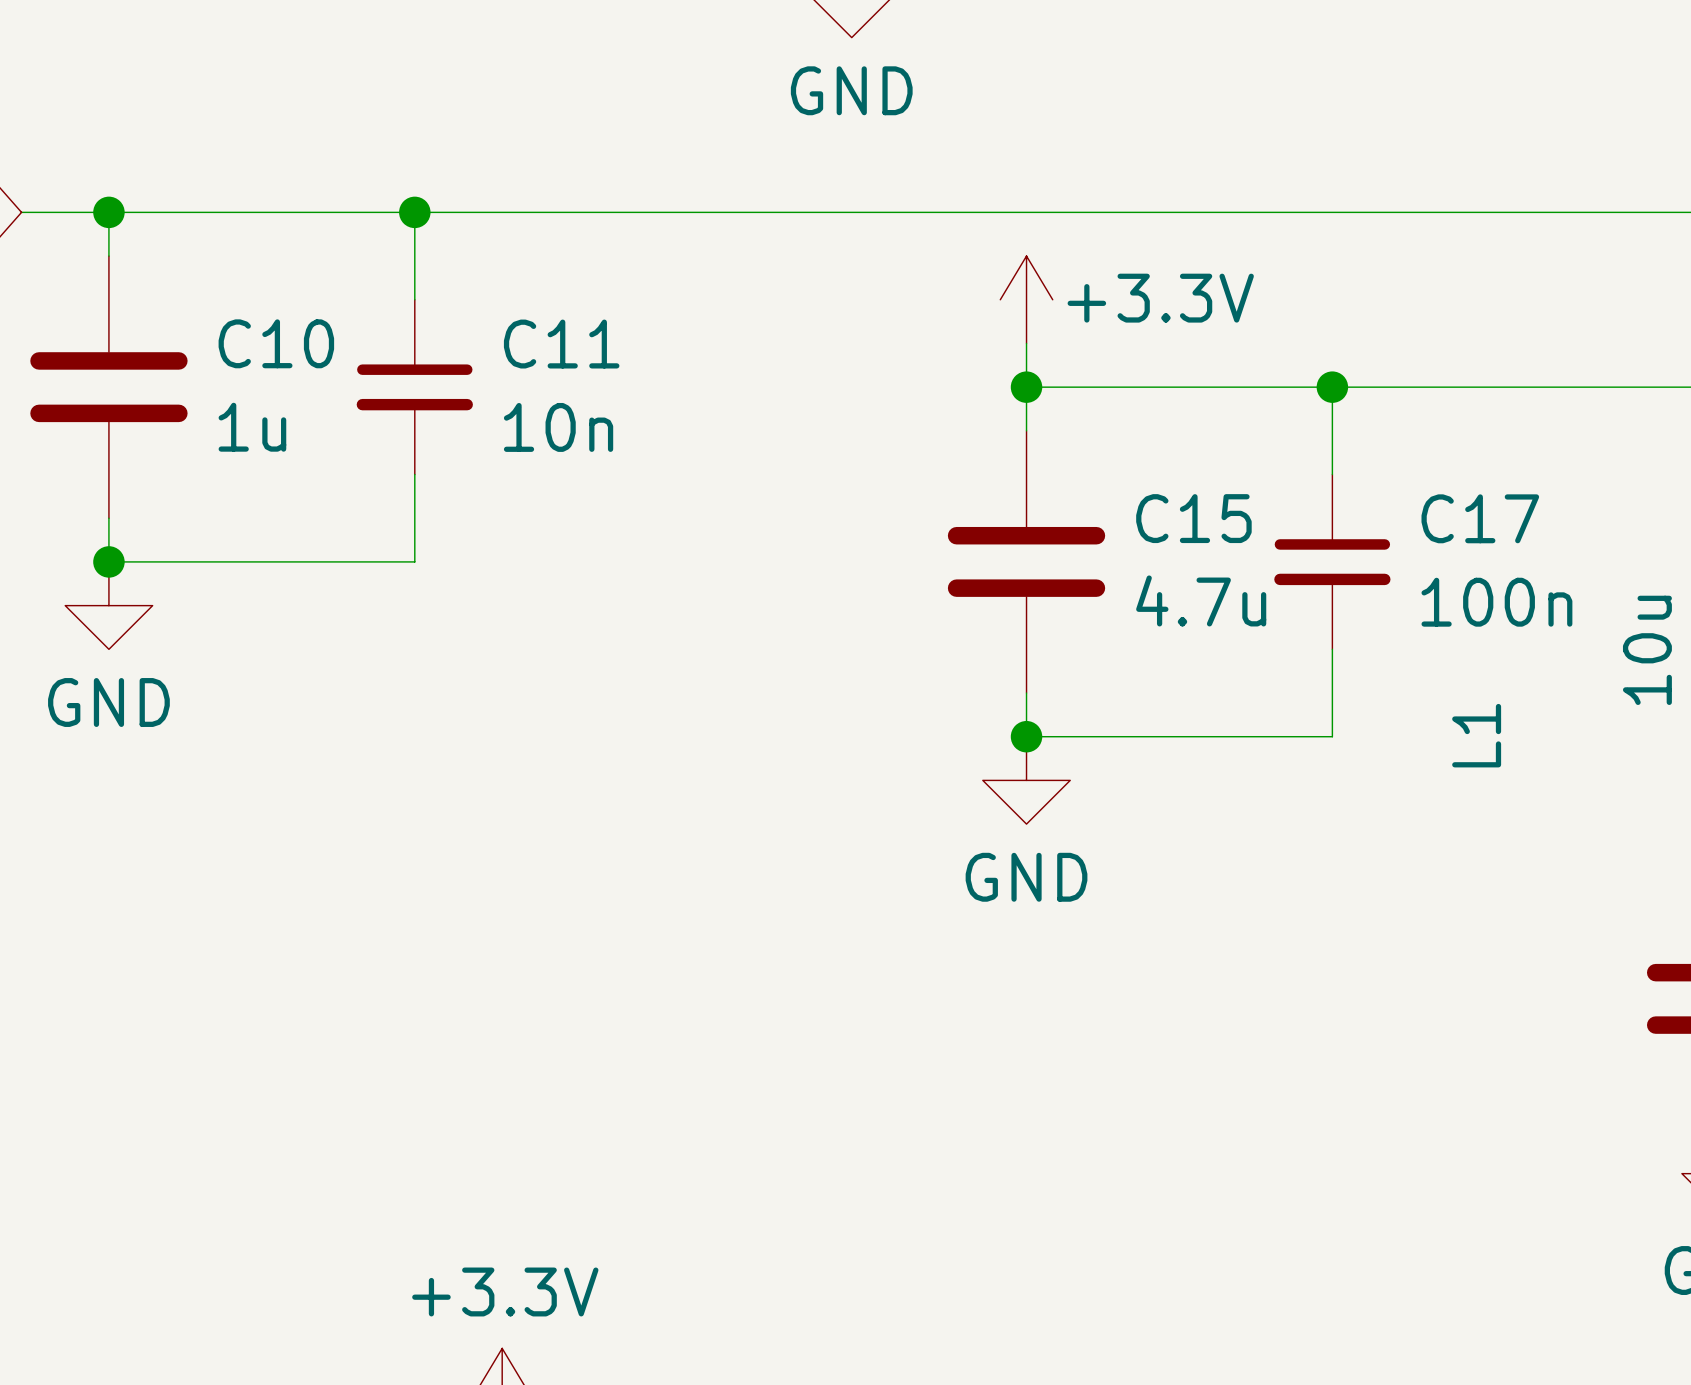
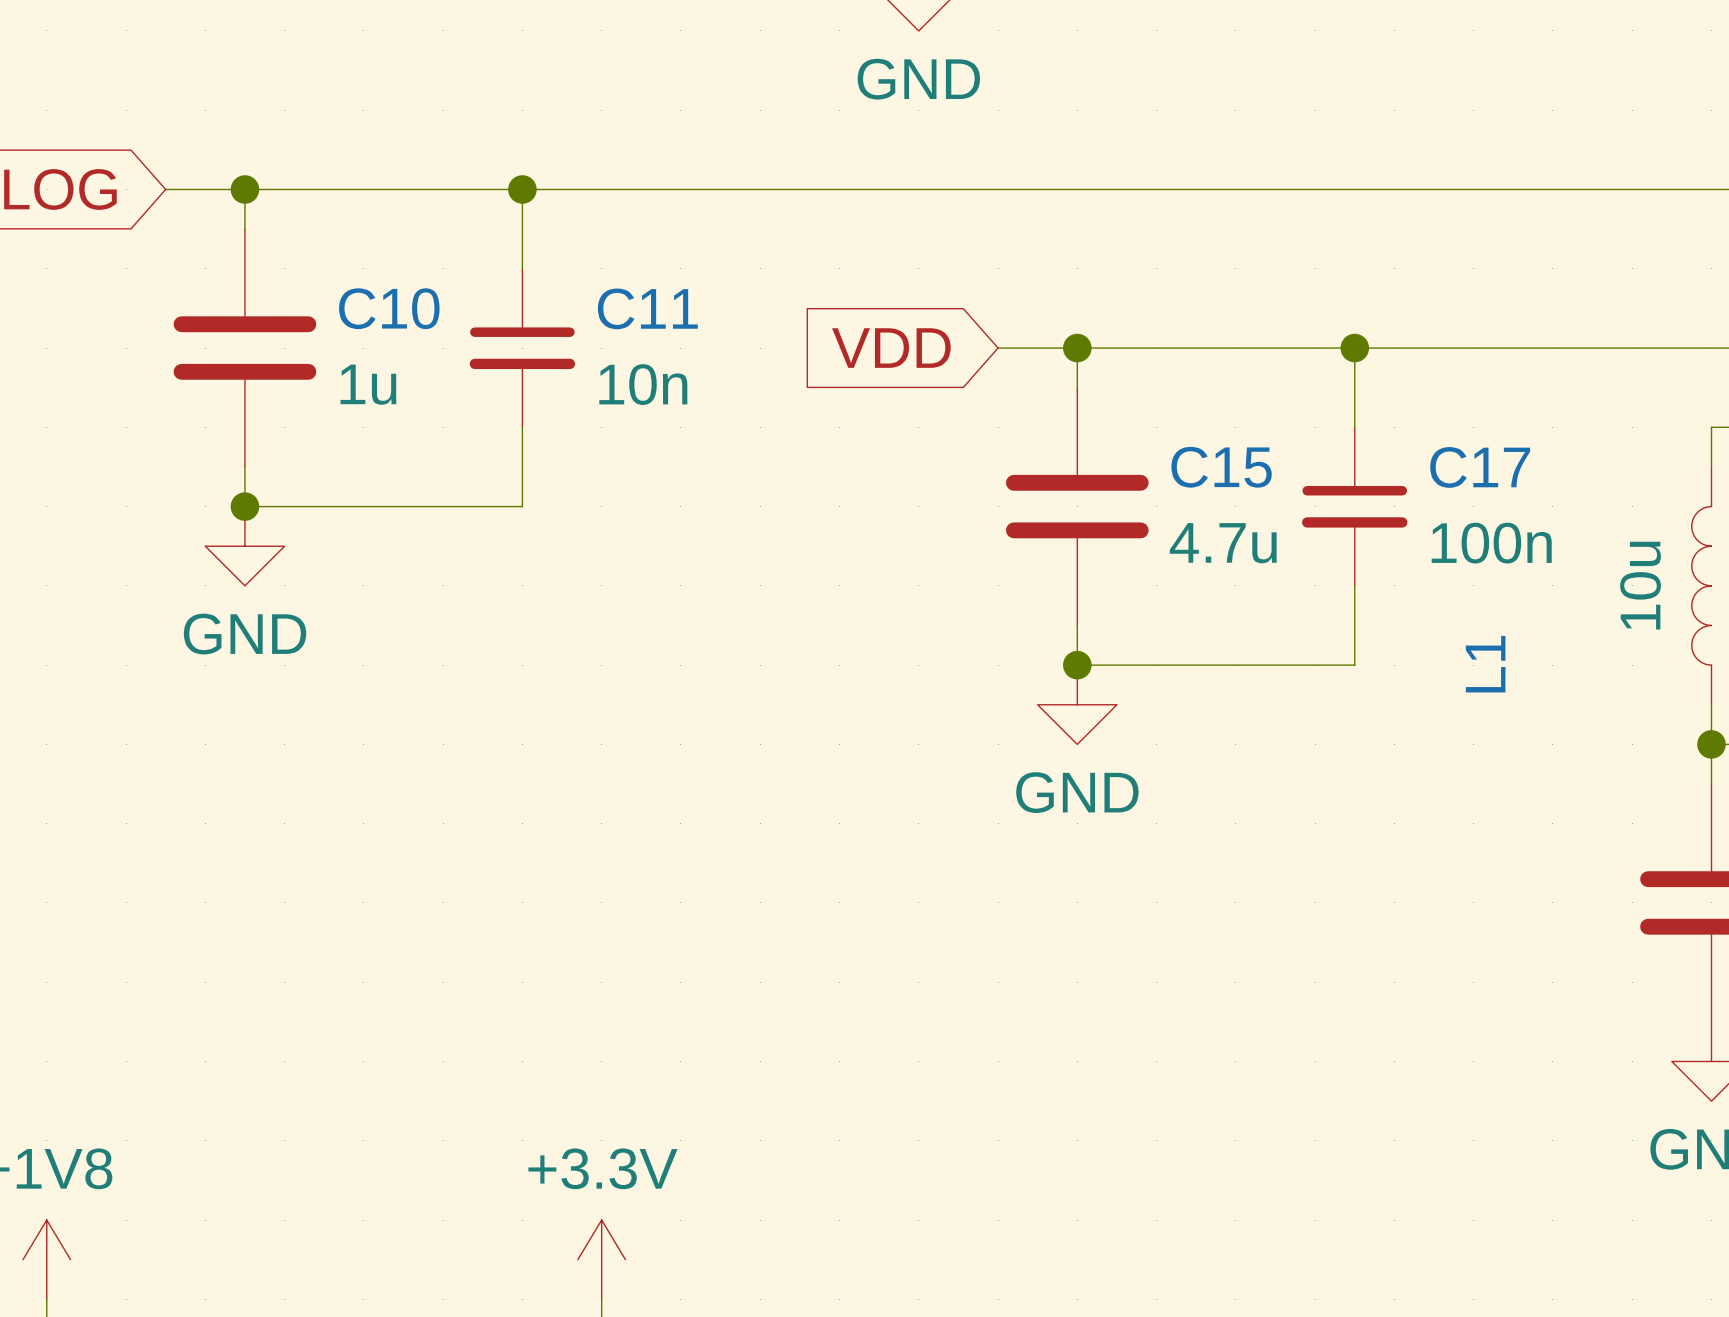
power symbol: +3.3V (1026, 299) -> none
wire: (1026, 343) (1026, 387) -> (998, 348) (1077, 348)
global label: none -> VDD (891, 348)

